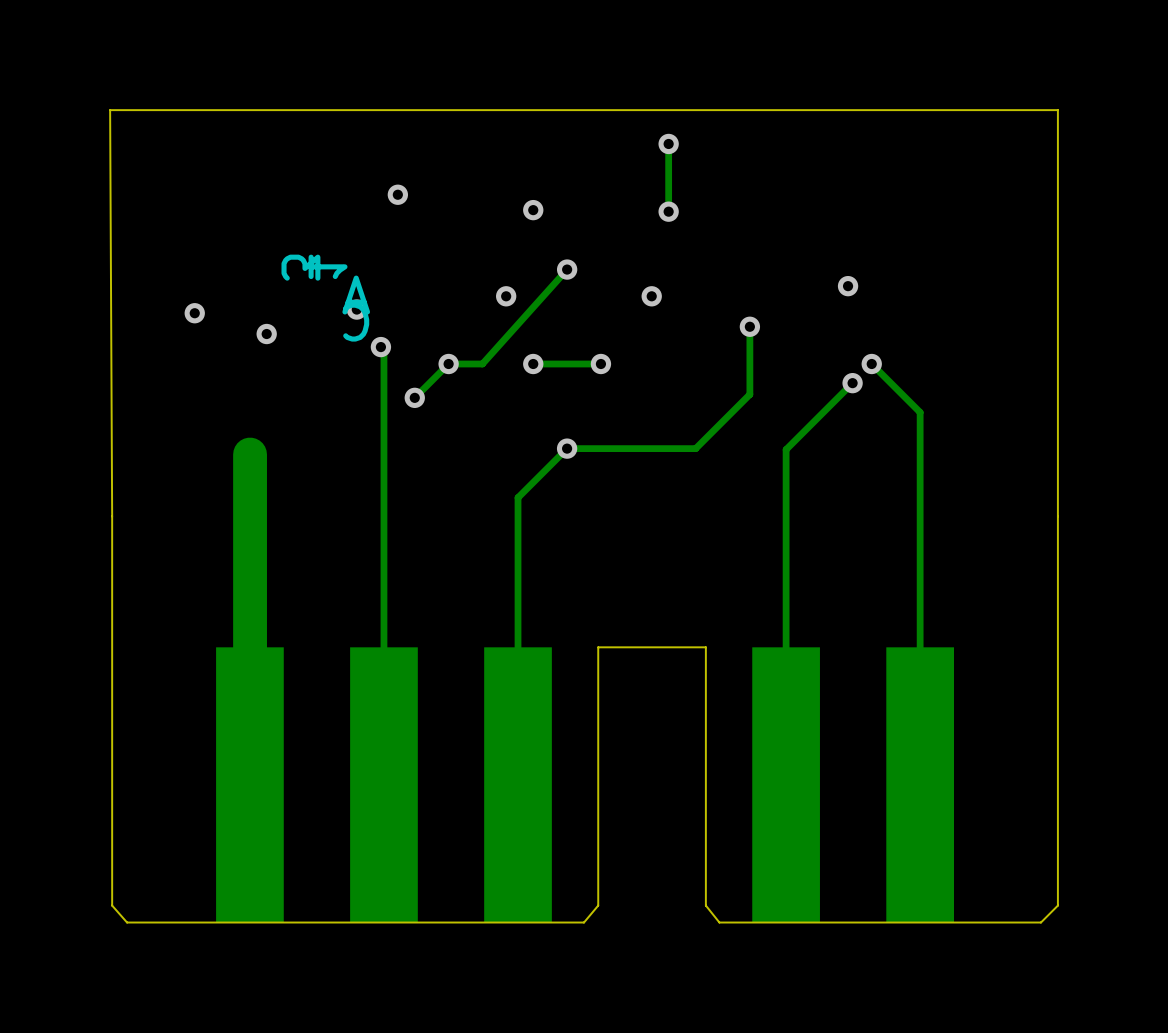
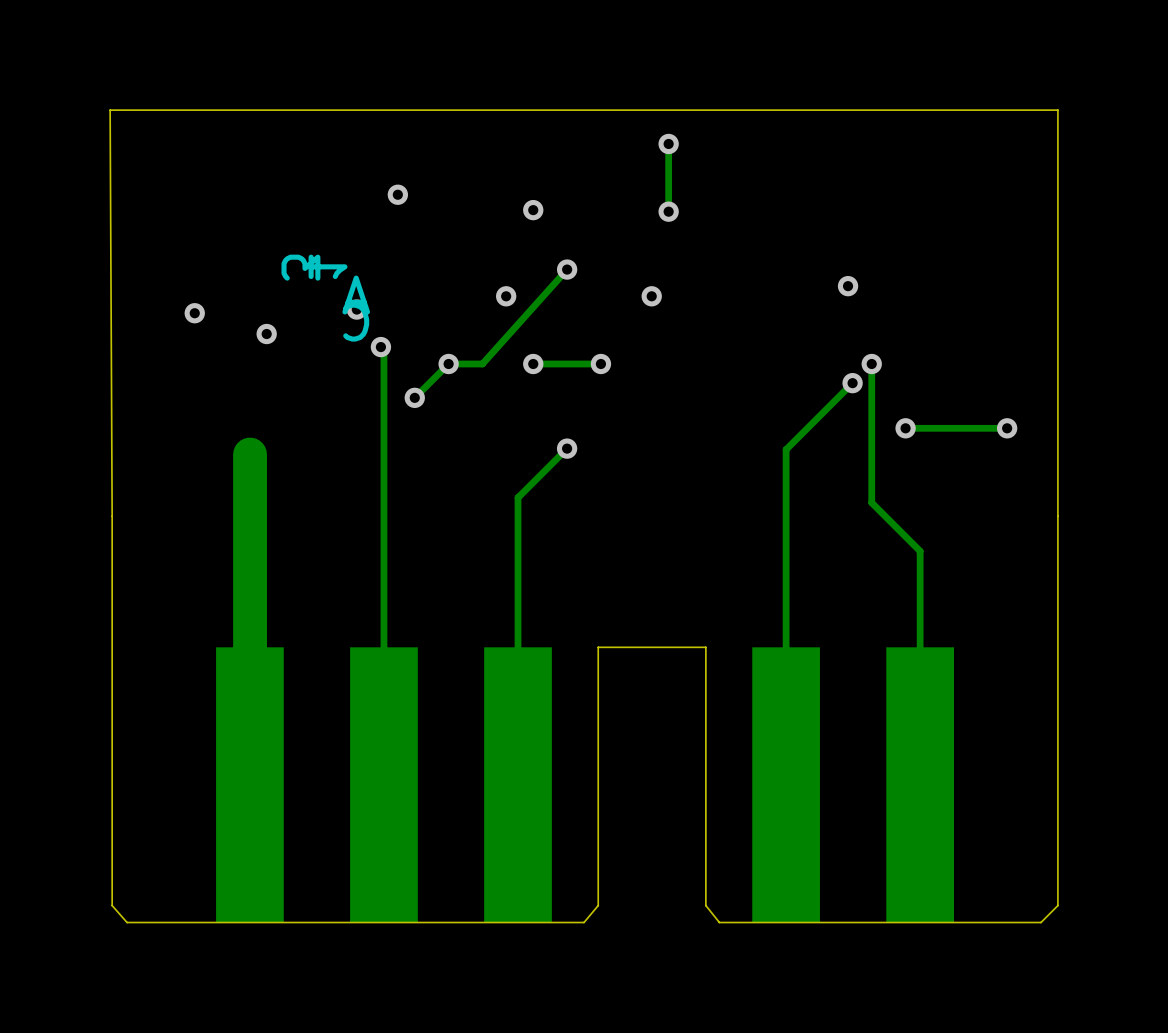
track: (749, 326) (749, 394) (695, 448) (567, 448) -> none
via: (749, 326) -> none
track: (871, 364) (920, 412) (920, 551) -> (871, 364) (871, 502) (920, 551)
via: none -> (905, 428)
track: none -> (1007, 428) (905, 428)
via: none -> (1007, 428)

